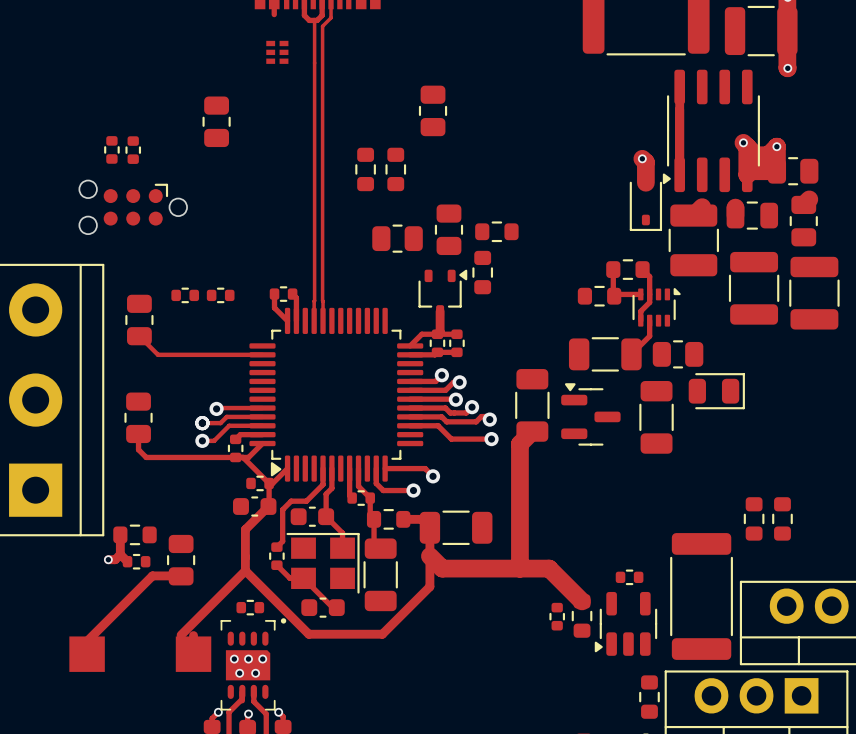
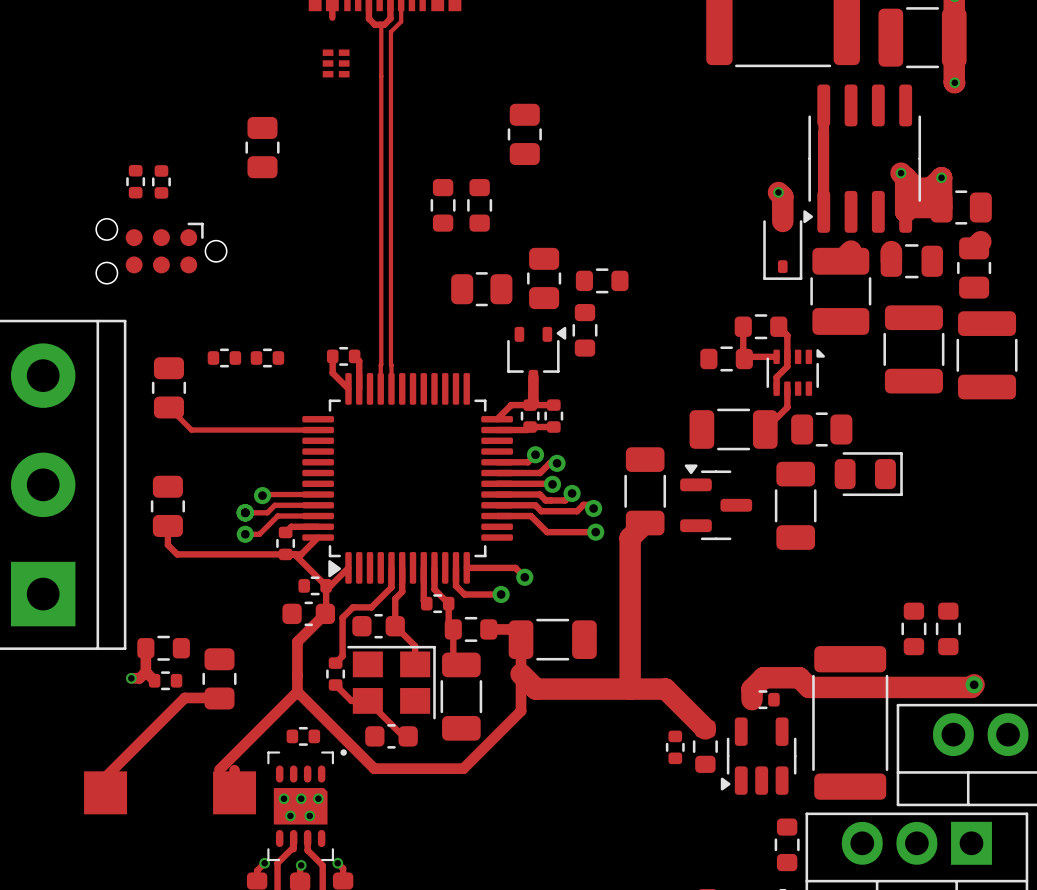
track: none -> (974, 684) (971, 687) (809, 687) (799, 677) (763, 677) (752, 689) (752, 699)
via: none -> (974, 684)

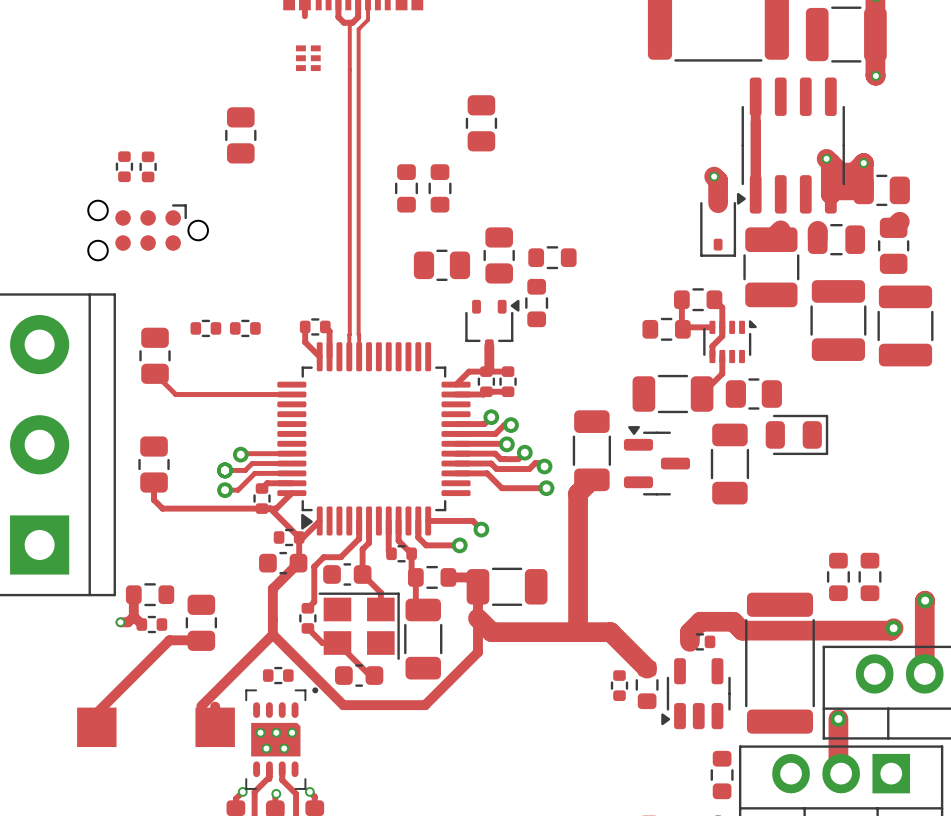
track: none -> (925, 600) (924, 673)
via: none -> (925, 600)
track: none -> (838, 718) (838, 770) (841, 773)
via: none -> (838, 718)

